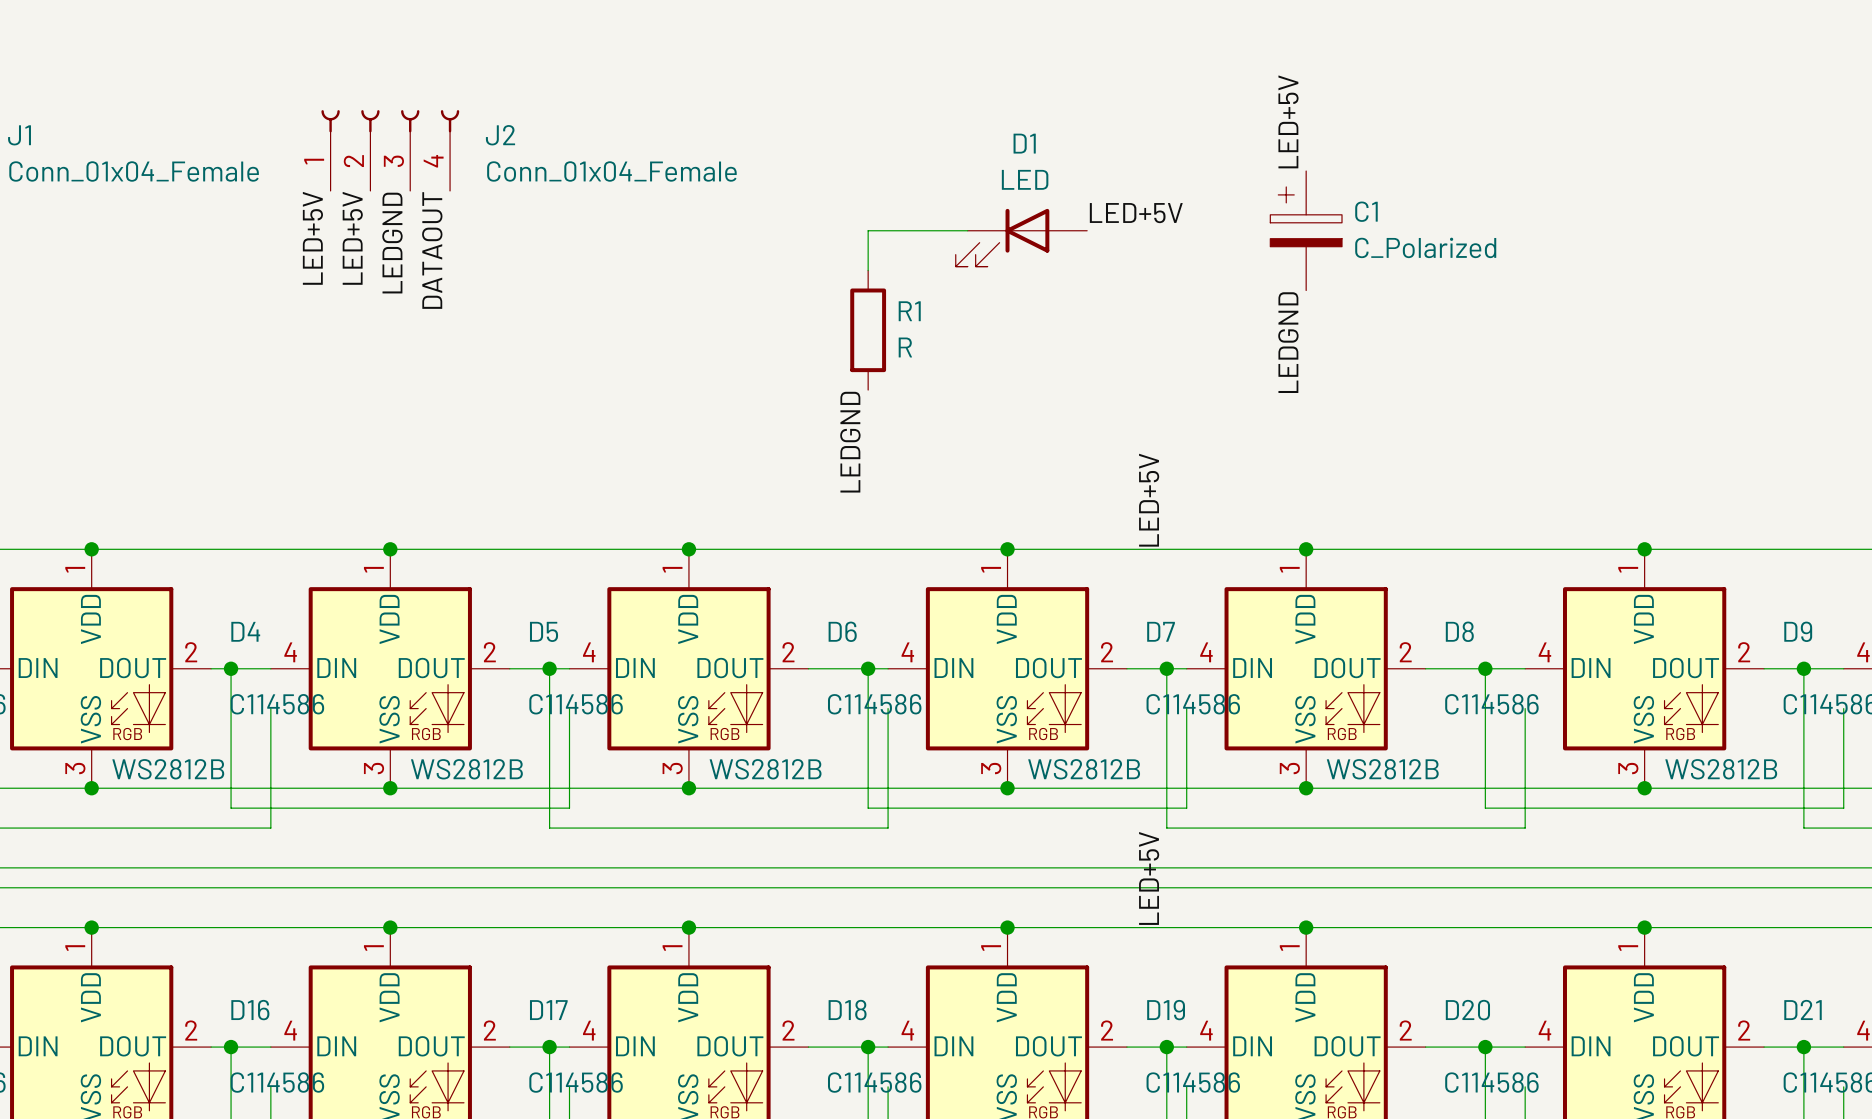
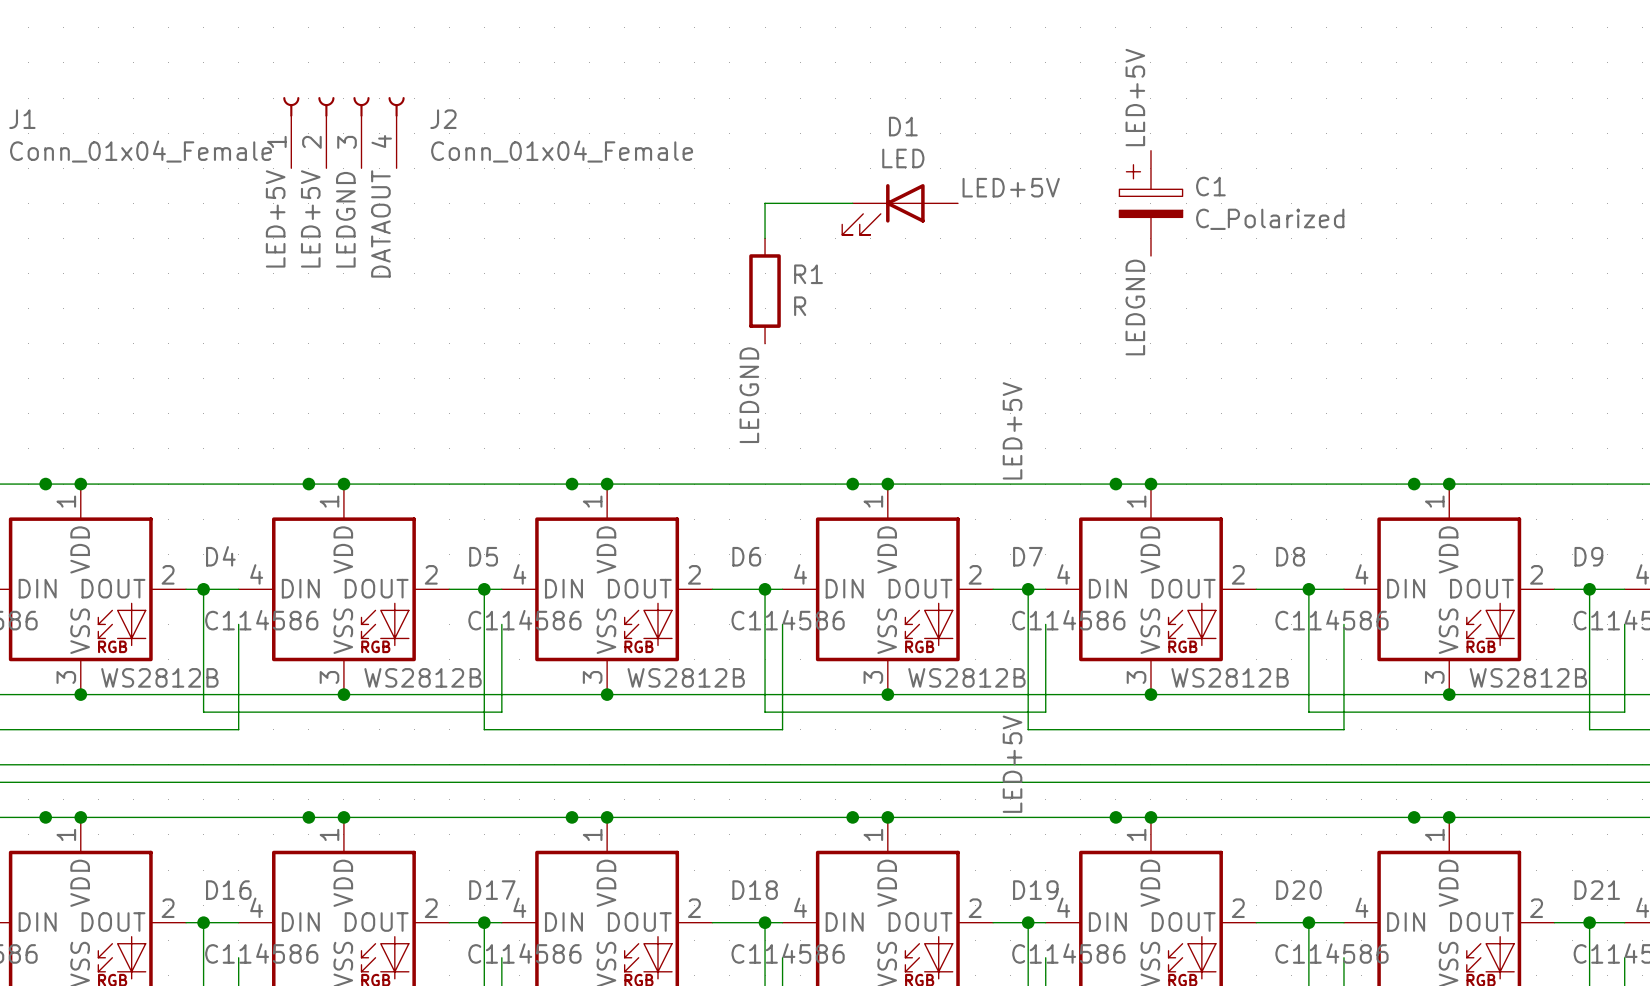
junction: none -> (45, 484)
junction: none -> (308, 484)
junction: none -> (572, 484)
junction: none -> (852, 484)
junction: none -> (1115, 484)
junction: none -> (1414, 484)
junction: none -> (45, 817)
junction: none -> (308, 817)
junction: none -> (572, 817)
junction: none -> (852, 817)
junction: none -> (1115, 817)
junction: none -> (1414, 817)

